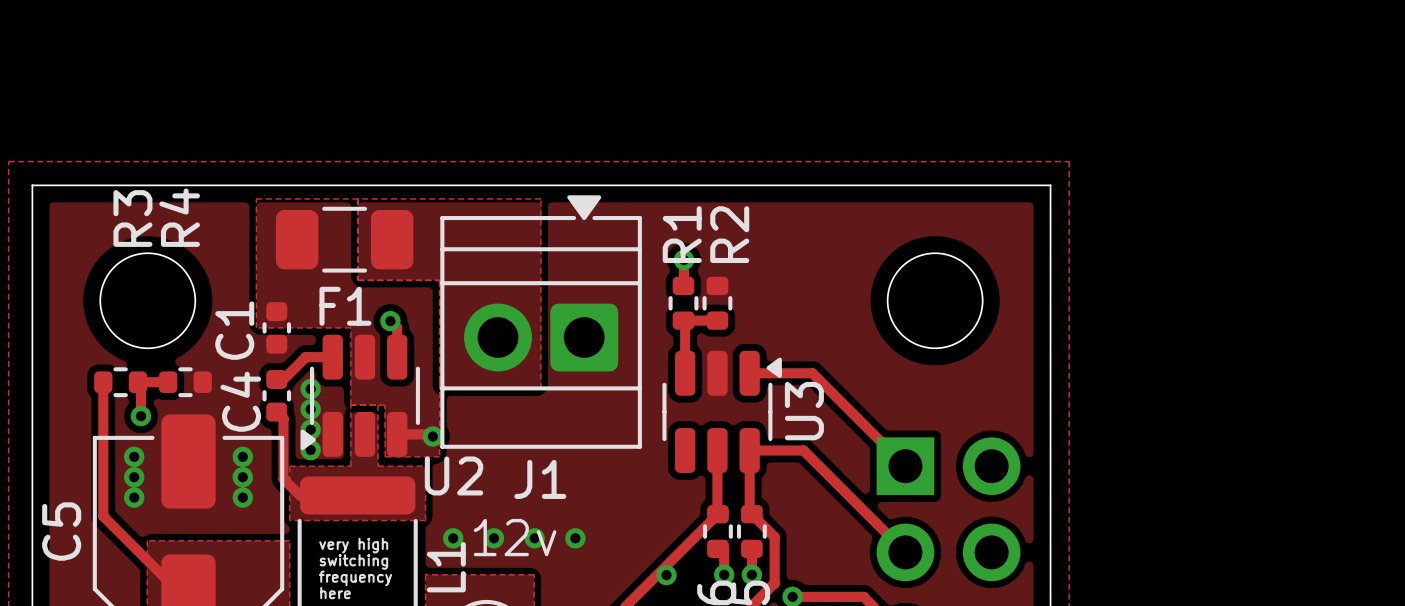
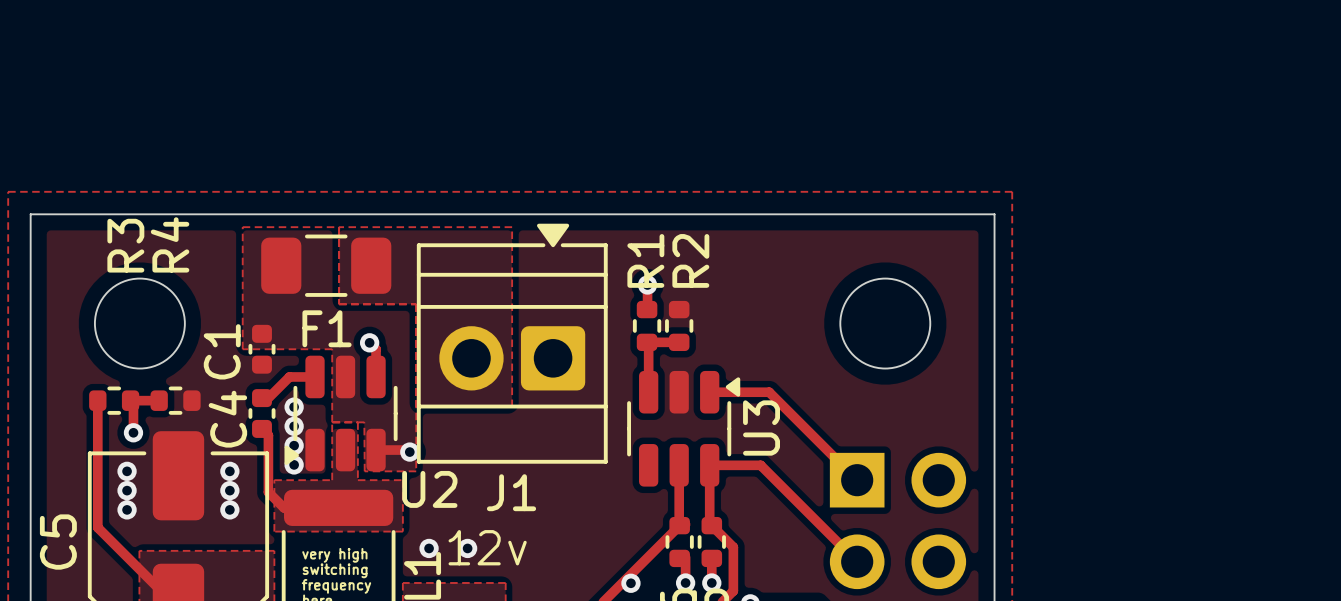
via: (534, 538) -> none
via: (575, 538) -> none

